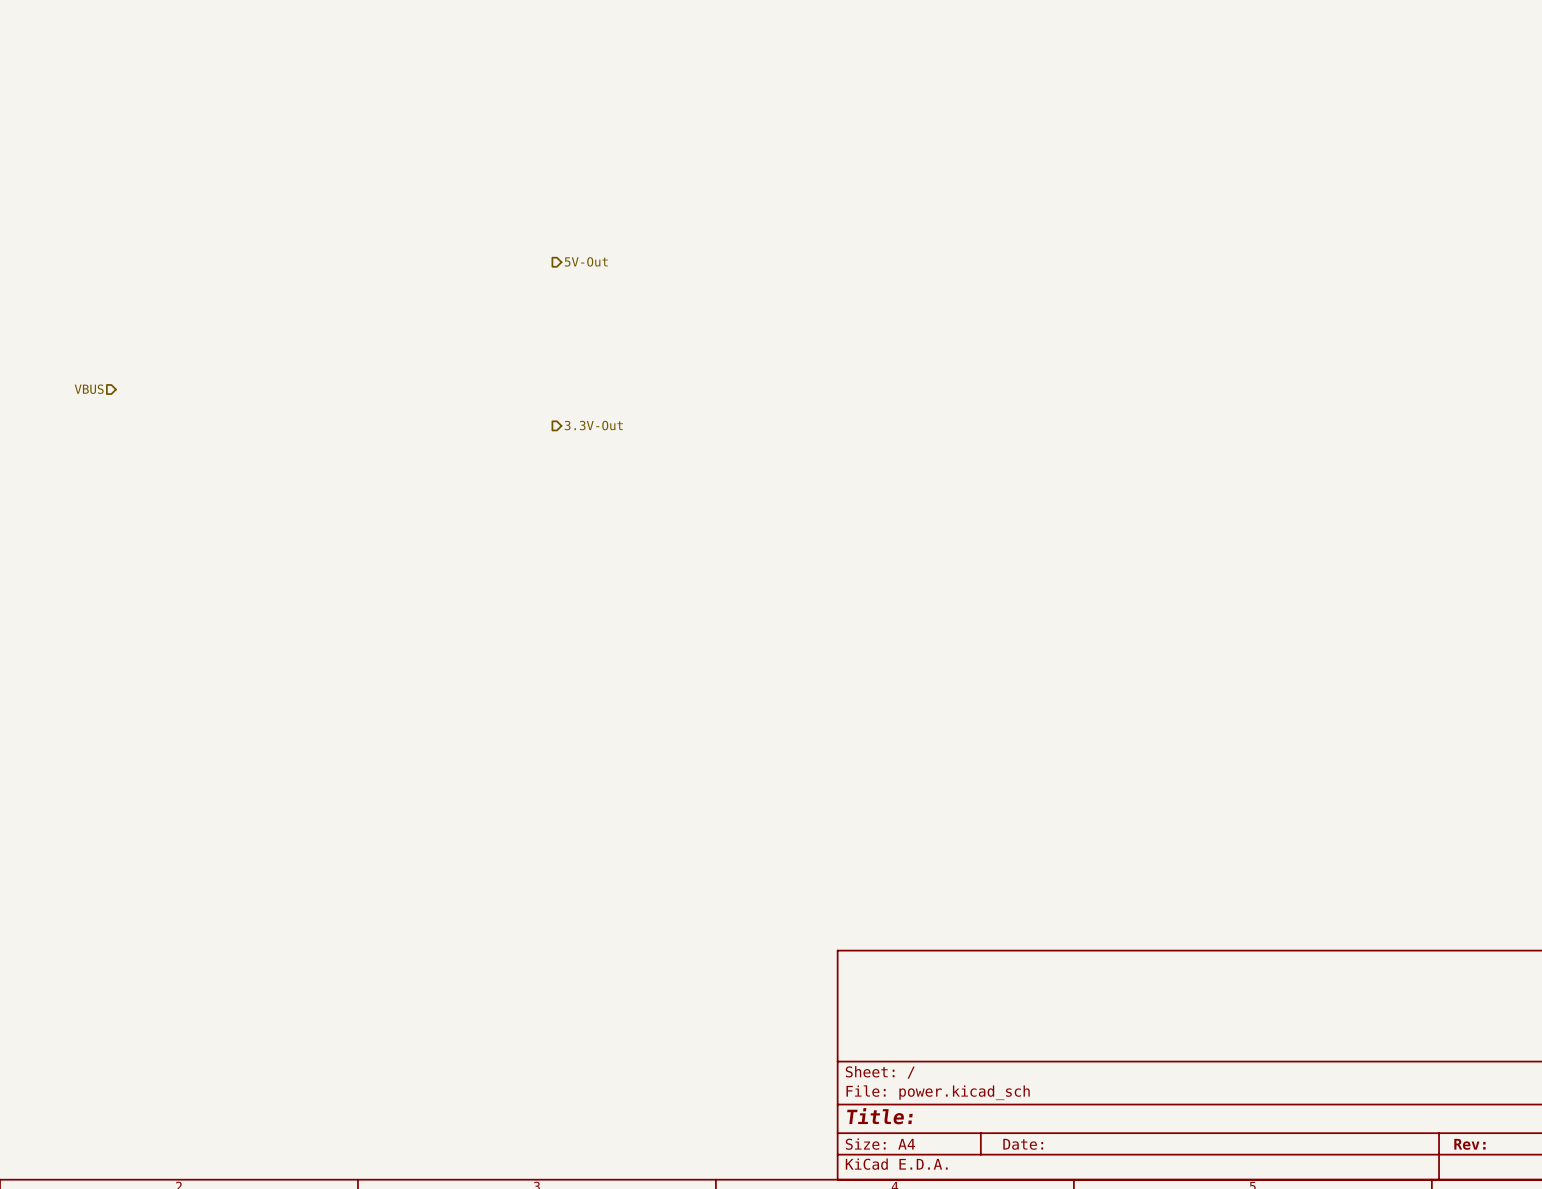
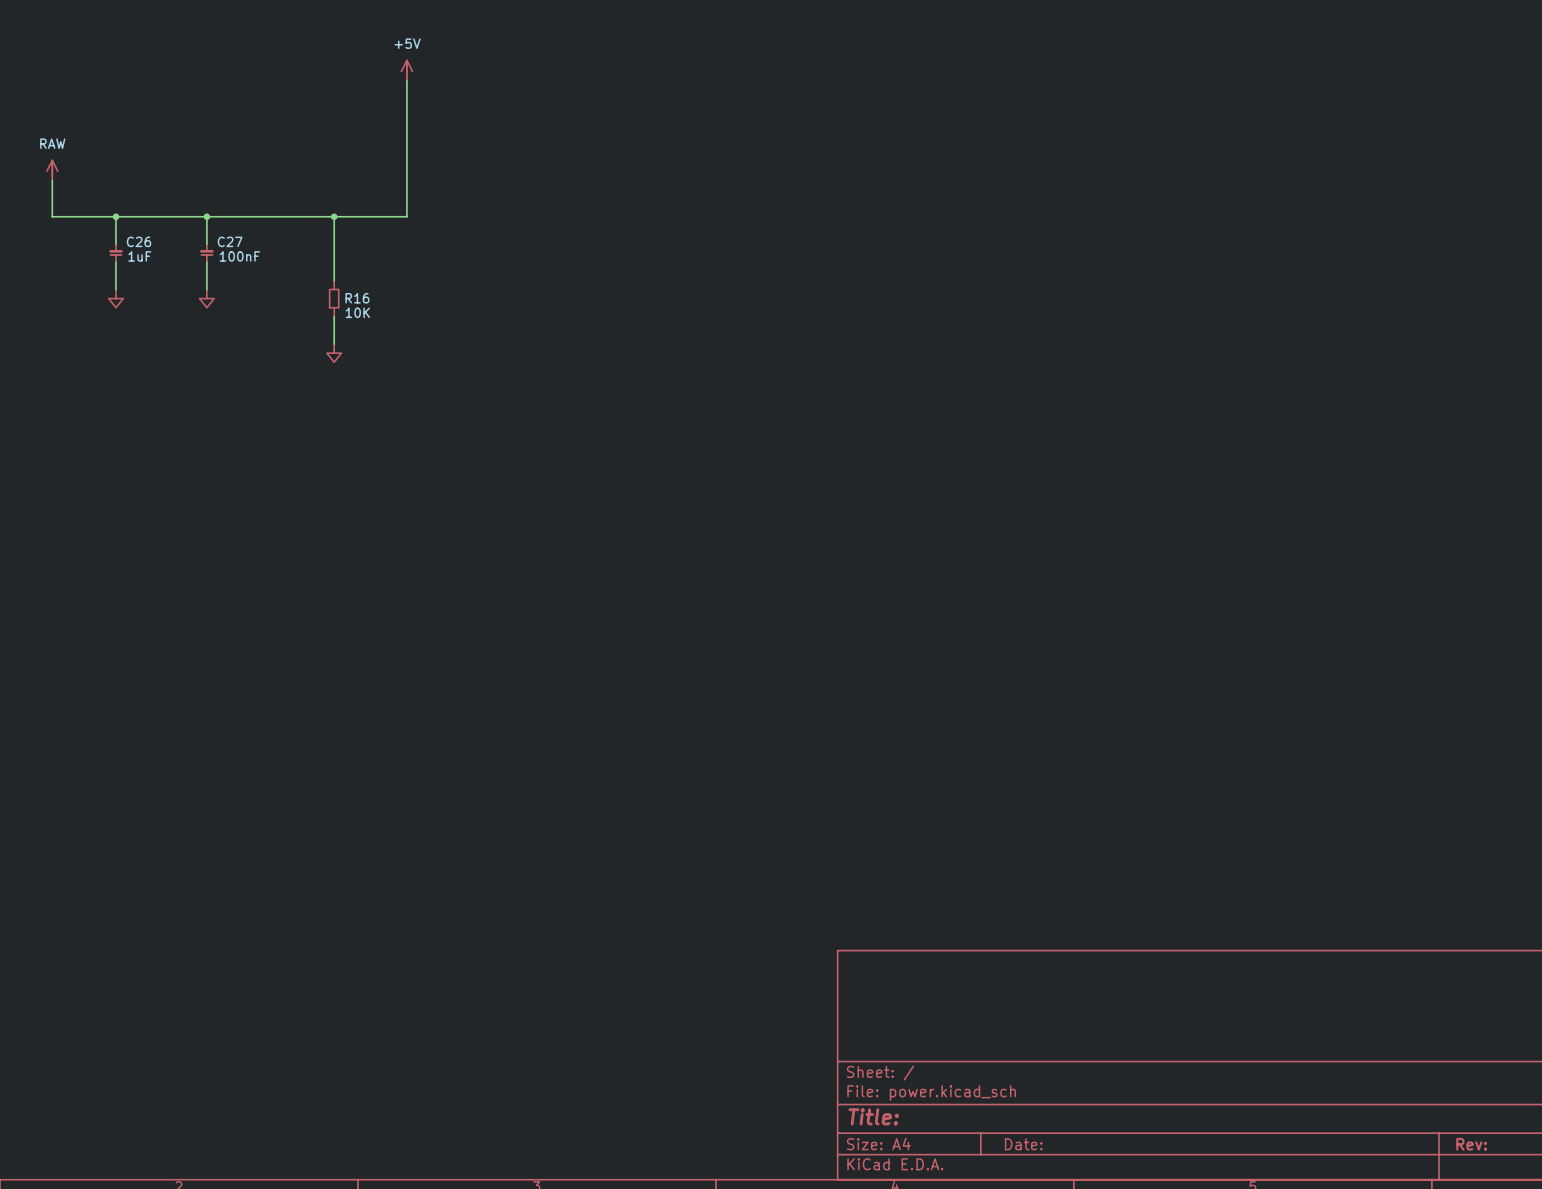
power symbol: none -> +5V (406, 70)
wire: none -> (406, 80) (406, 216) (52, 216) (52, 180)
power symbol: none -> RAW (52, 170)
wire: none -> (115, 216) (115, 244)
junction: none -> (115, 216)
wire: none -> (206, 216) (206, 244)
junction: none -> (206, 216)
wire: none -> (334, 216) (334, 280)
junction: none -> (334, 216)
C26: none -> 1uF (115, 253)
C27: none -> 100nF (206, 253)
hierarchical label: 5V-Out (586, 261) -> none
wire: none -> (115, 262) (115, 289)
wire: none -> (206, 262) (206, 289)
power symbol: none -> (115, 298)
power symbol: none -> (206, 298)
R16: none -> 10K (334, 298)
wire: none -> (334, 316) (334, 344)
power symbol: none -> (334, 353)
hierarchical label: VBUS (89, 389) -> none
hierarchical label: 3.3V-Out (593, 425) -> none

